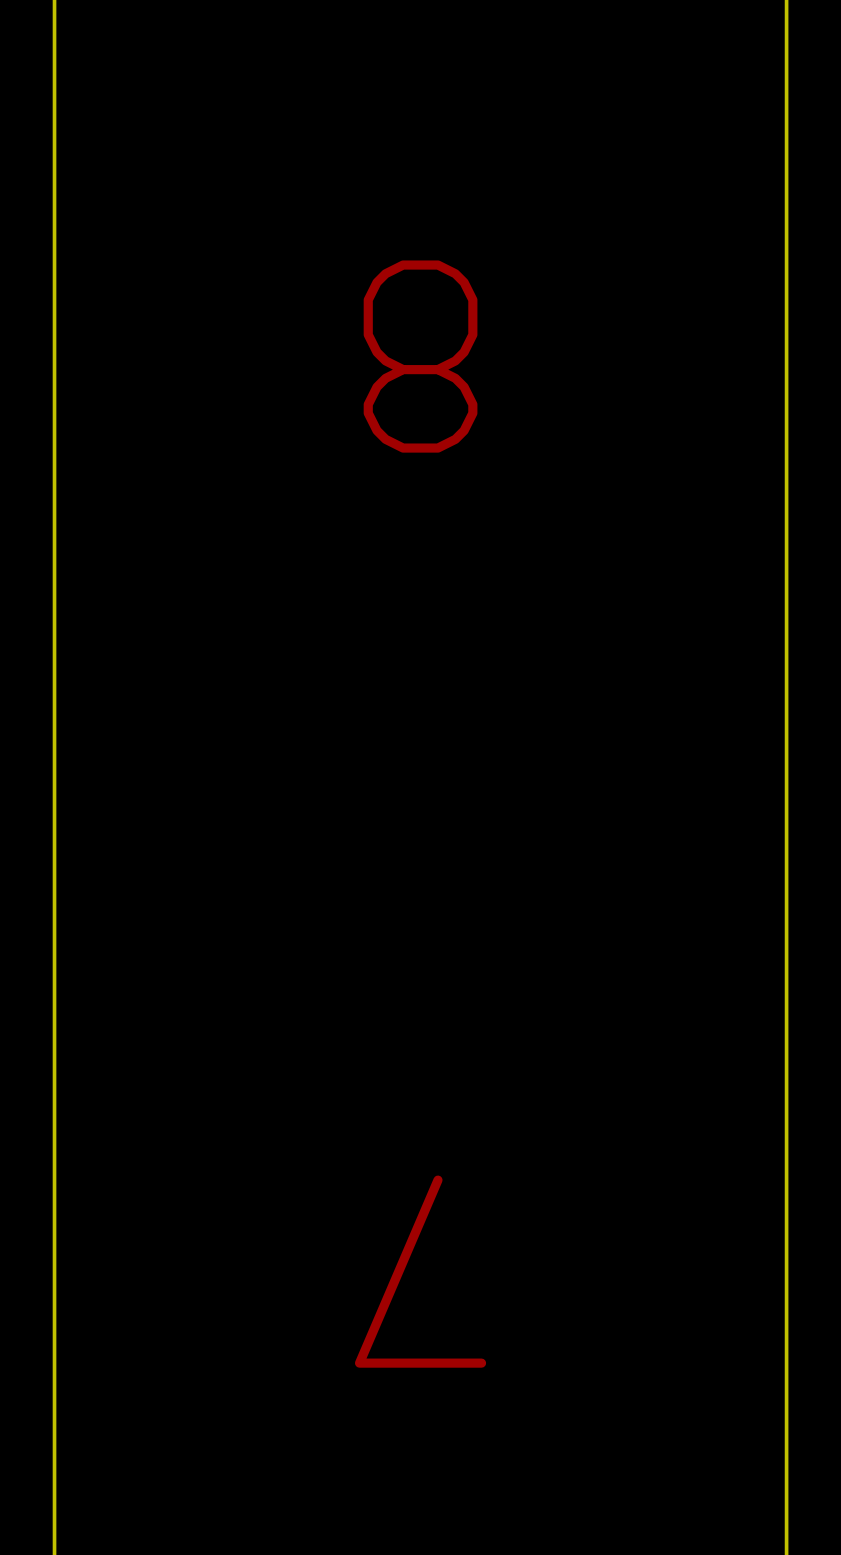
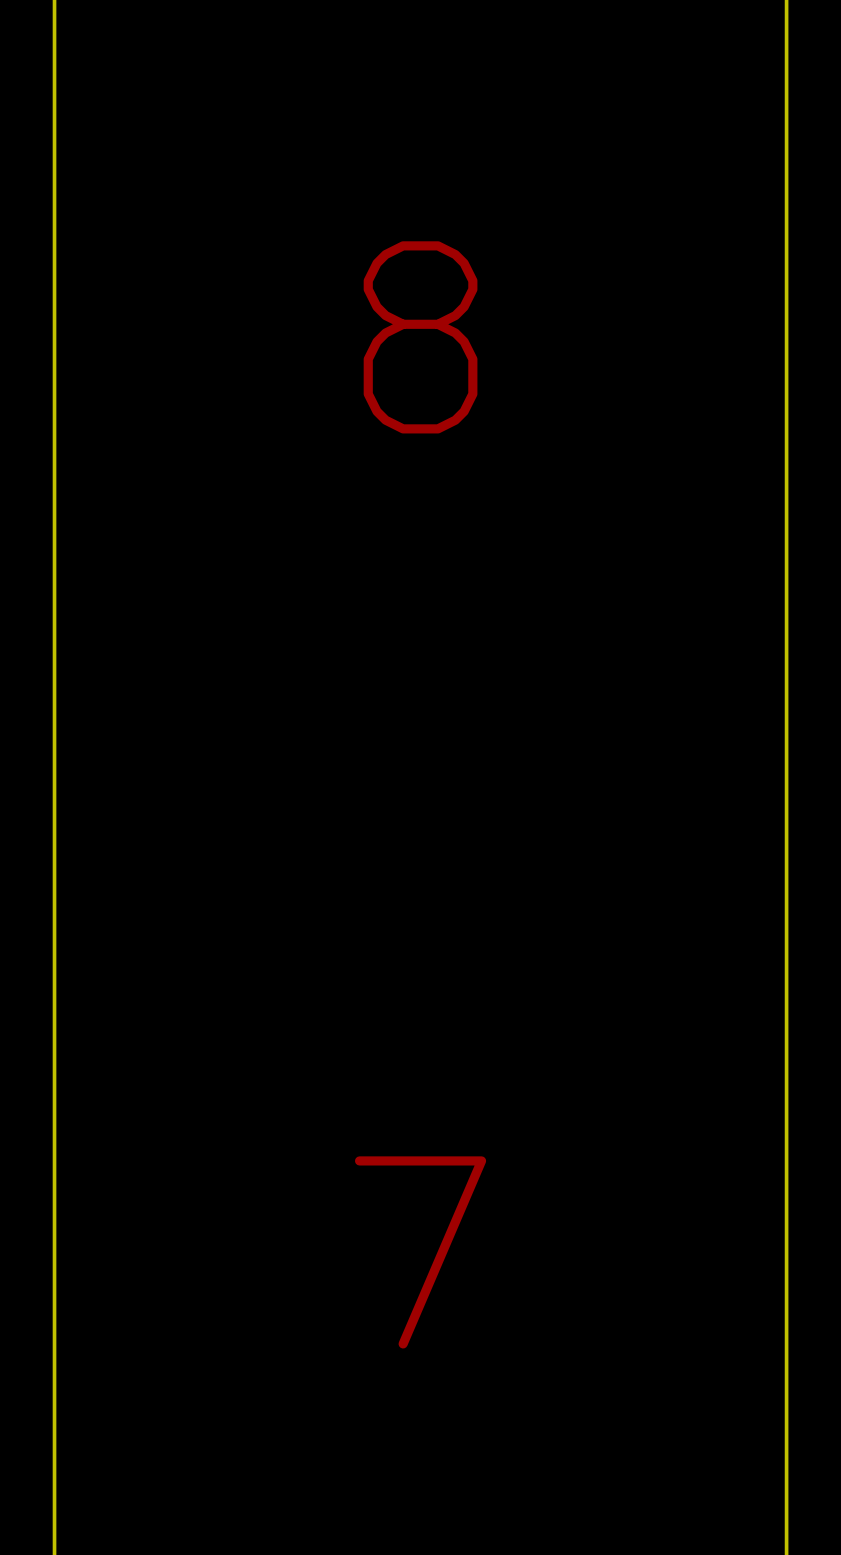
text rotation: 0° (420, 356) -> 180° (420, 337)
text rotation: 0° (420, 1271) -> 180° (420, 1252)

